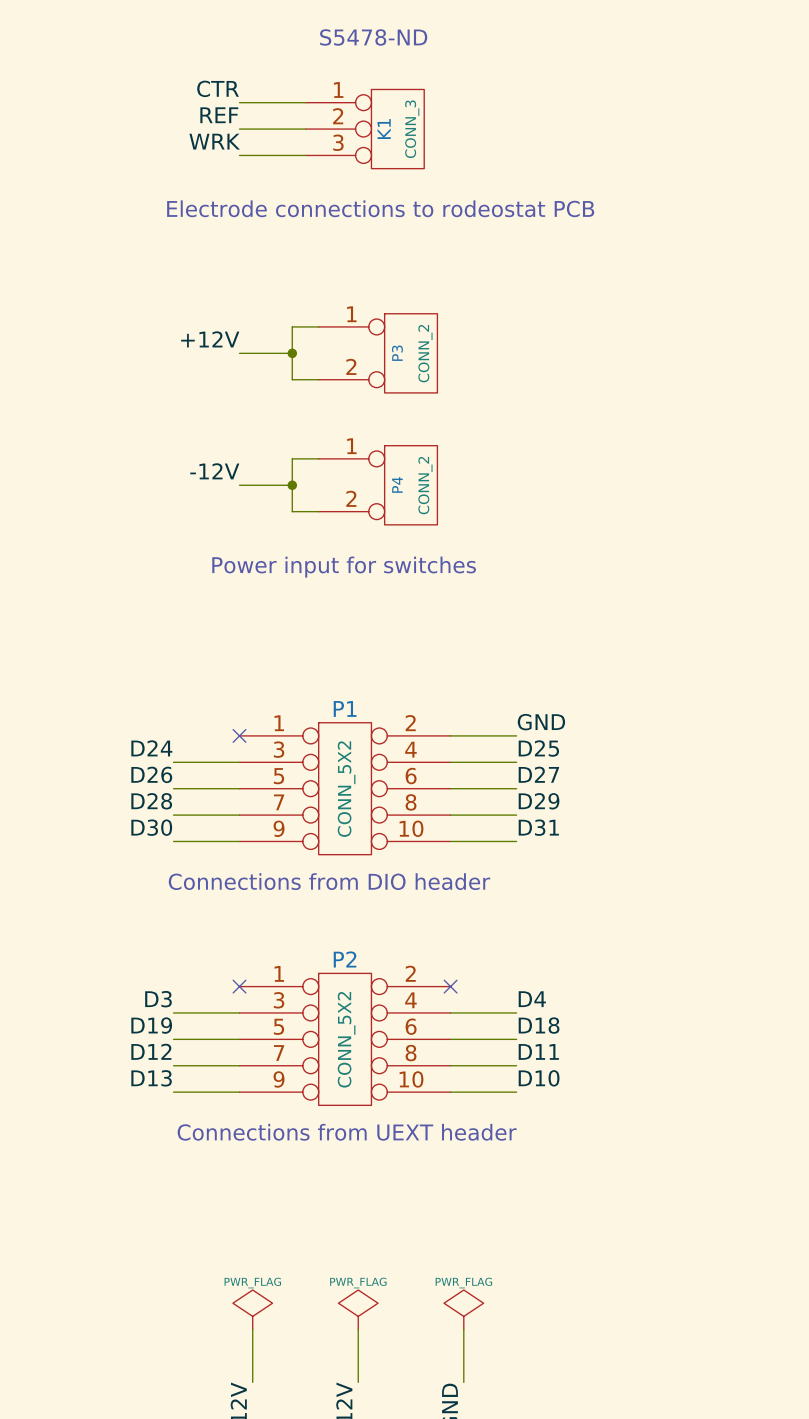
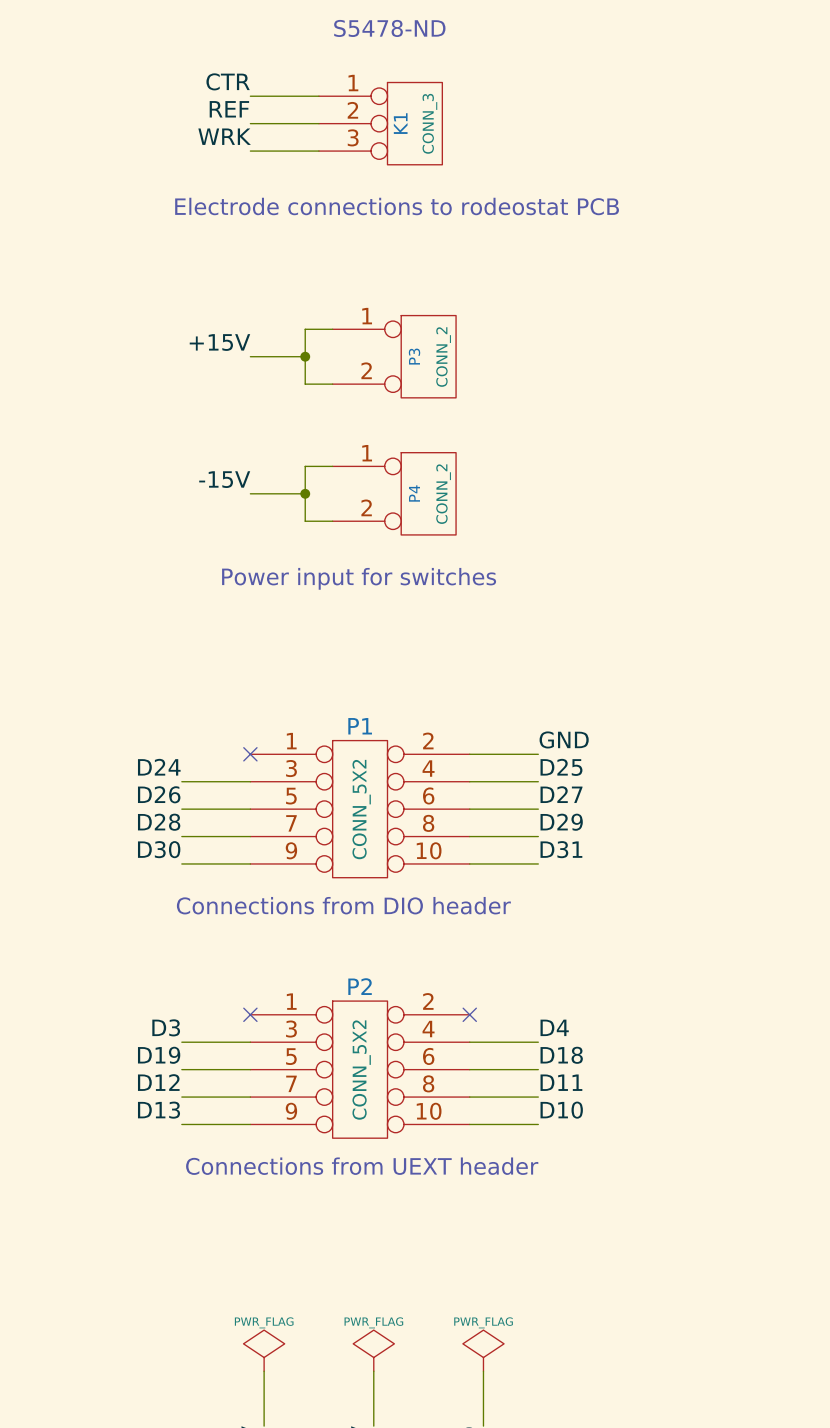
label: +12V (210, 339) -> +15V (219, 342)
label: -12V (214, 471) -> -15V (224, 479)

